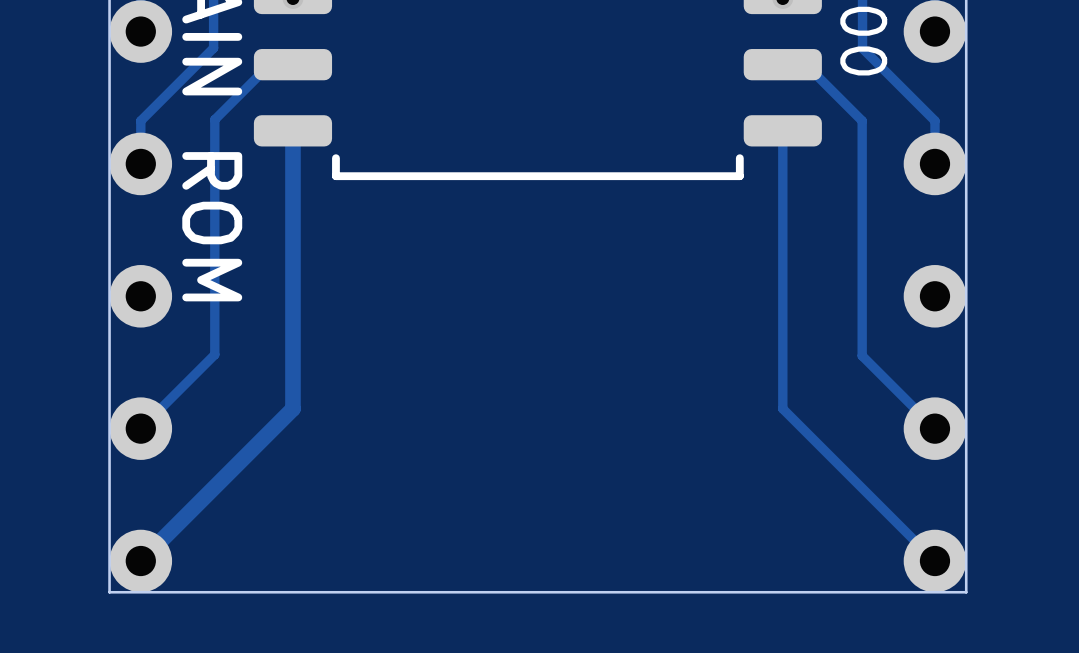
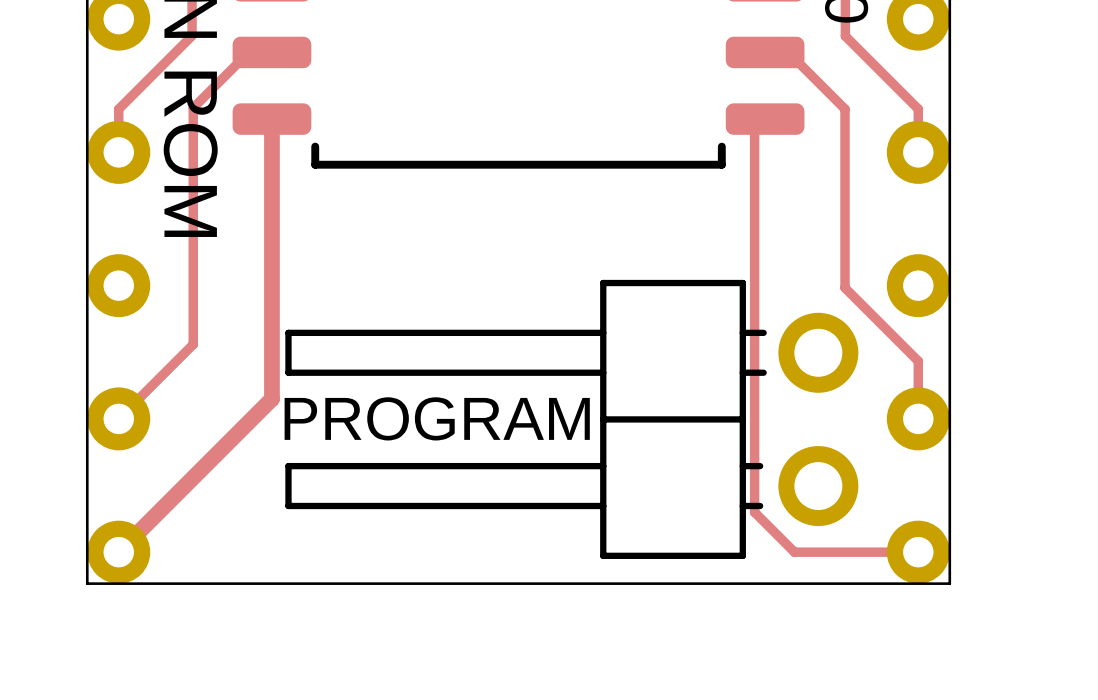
track: (782, 130) (782, 408) (934, 561) -> (765, 119) (754, 129) (754, 512) (794, 552) (918, 552)
track: (862, 298) (862, 355) (934, 428) -> (845, 287) (918, 361) (918, 418)
text: none -> PROGRAM (437, 418)
part: none -> (571, 419)

